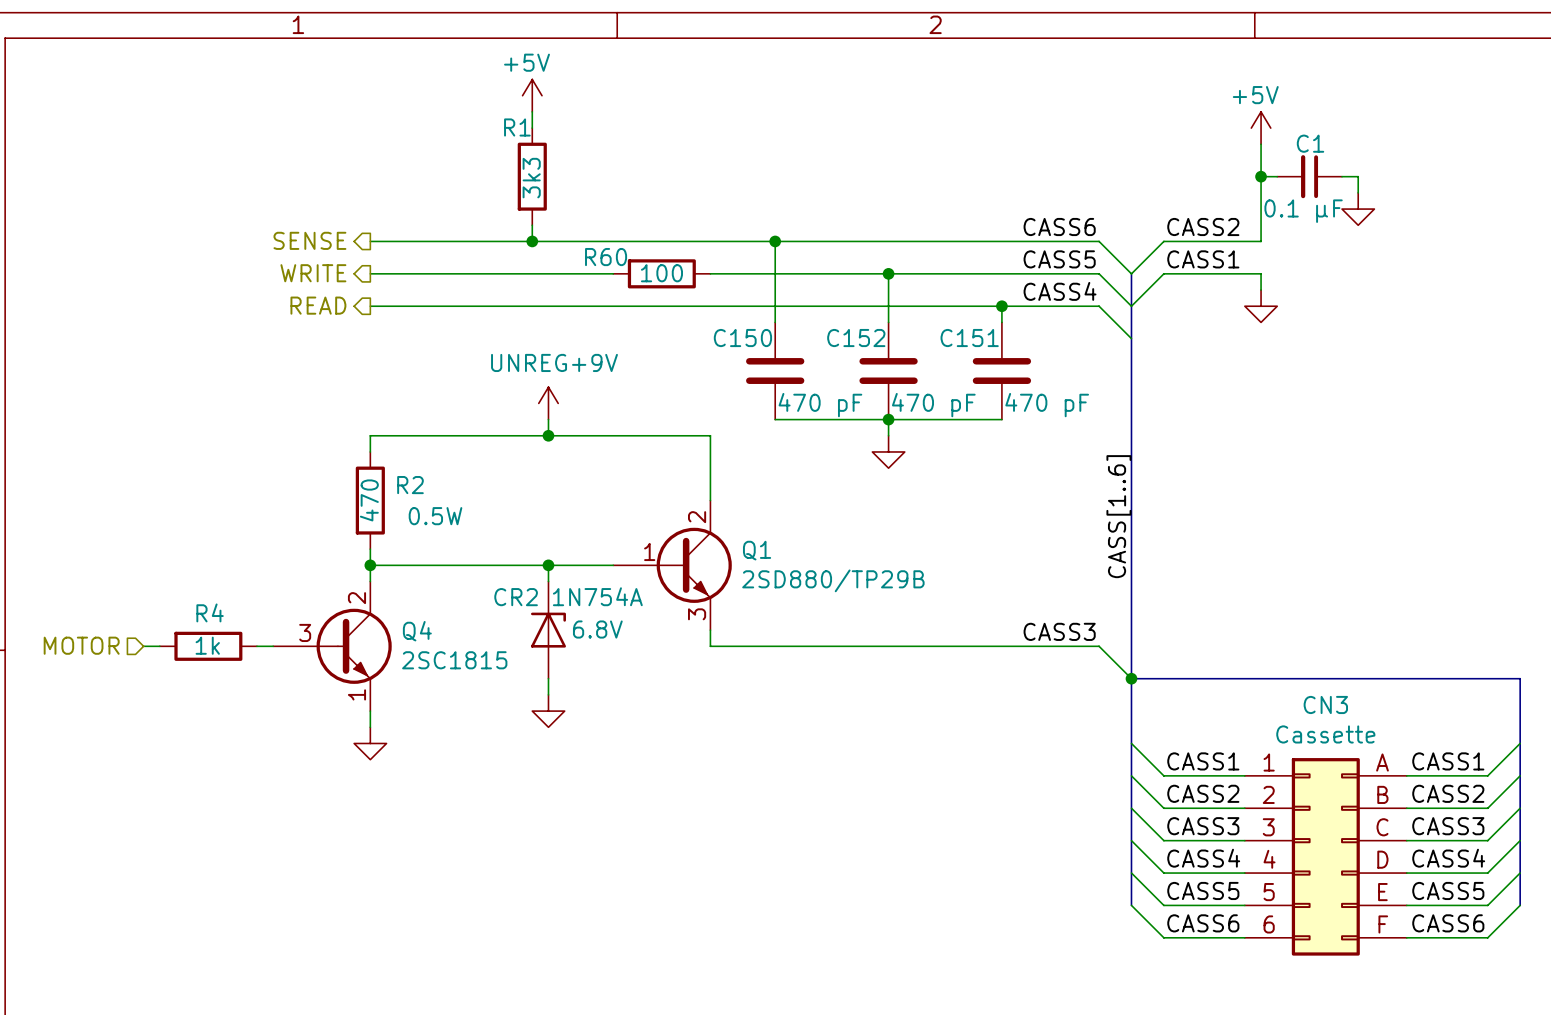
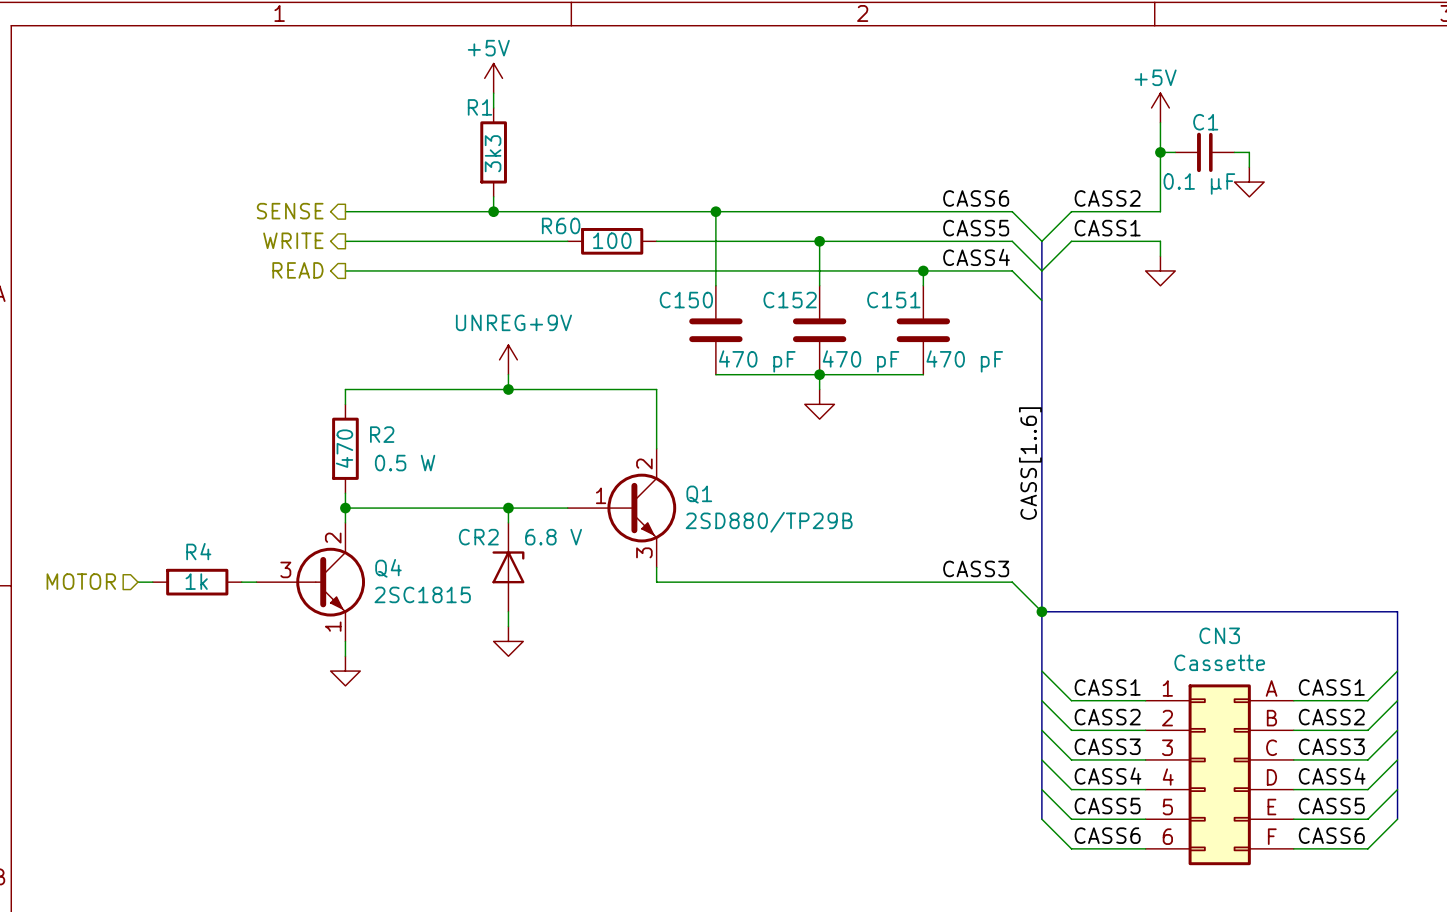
R2 text: 0.5W (435, 516) -> 0.5 W (405, 463)
CR2 value: 1N754A (597, 596) -> 6.8 V (553, 537)
CR2 text: 6.8V (597, 629) -> none

